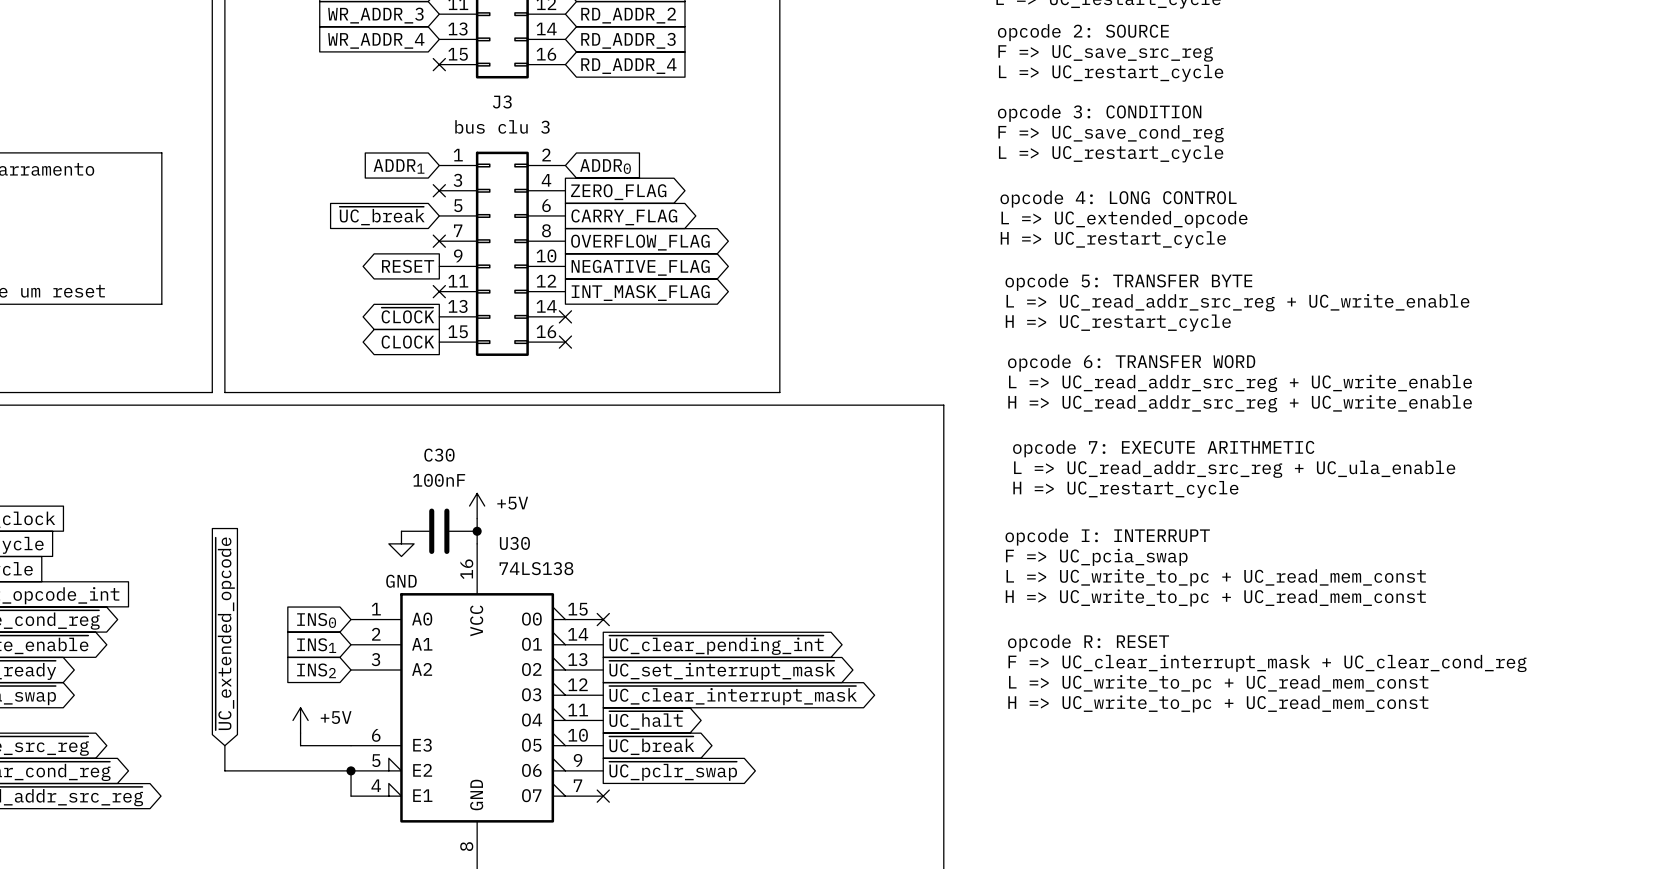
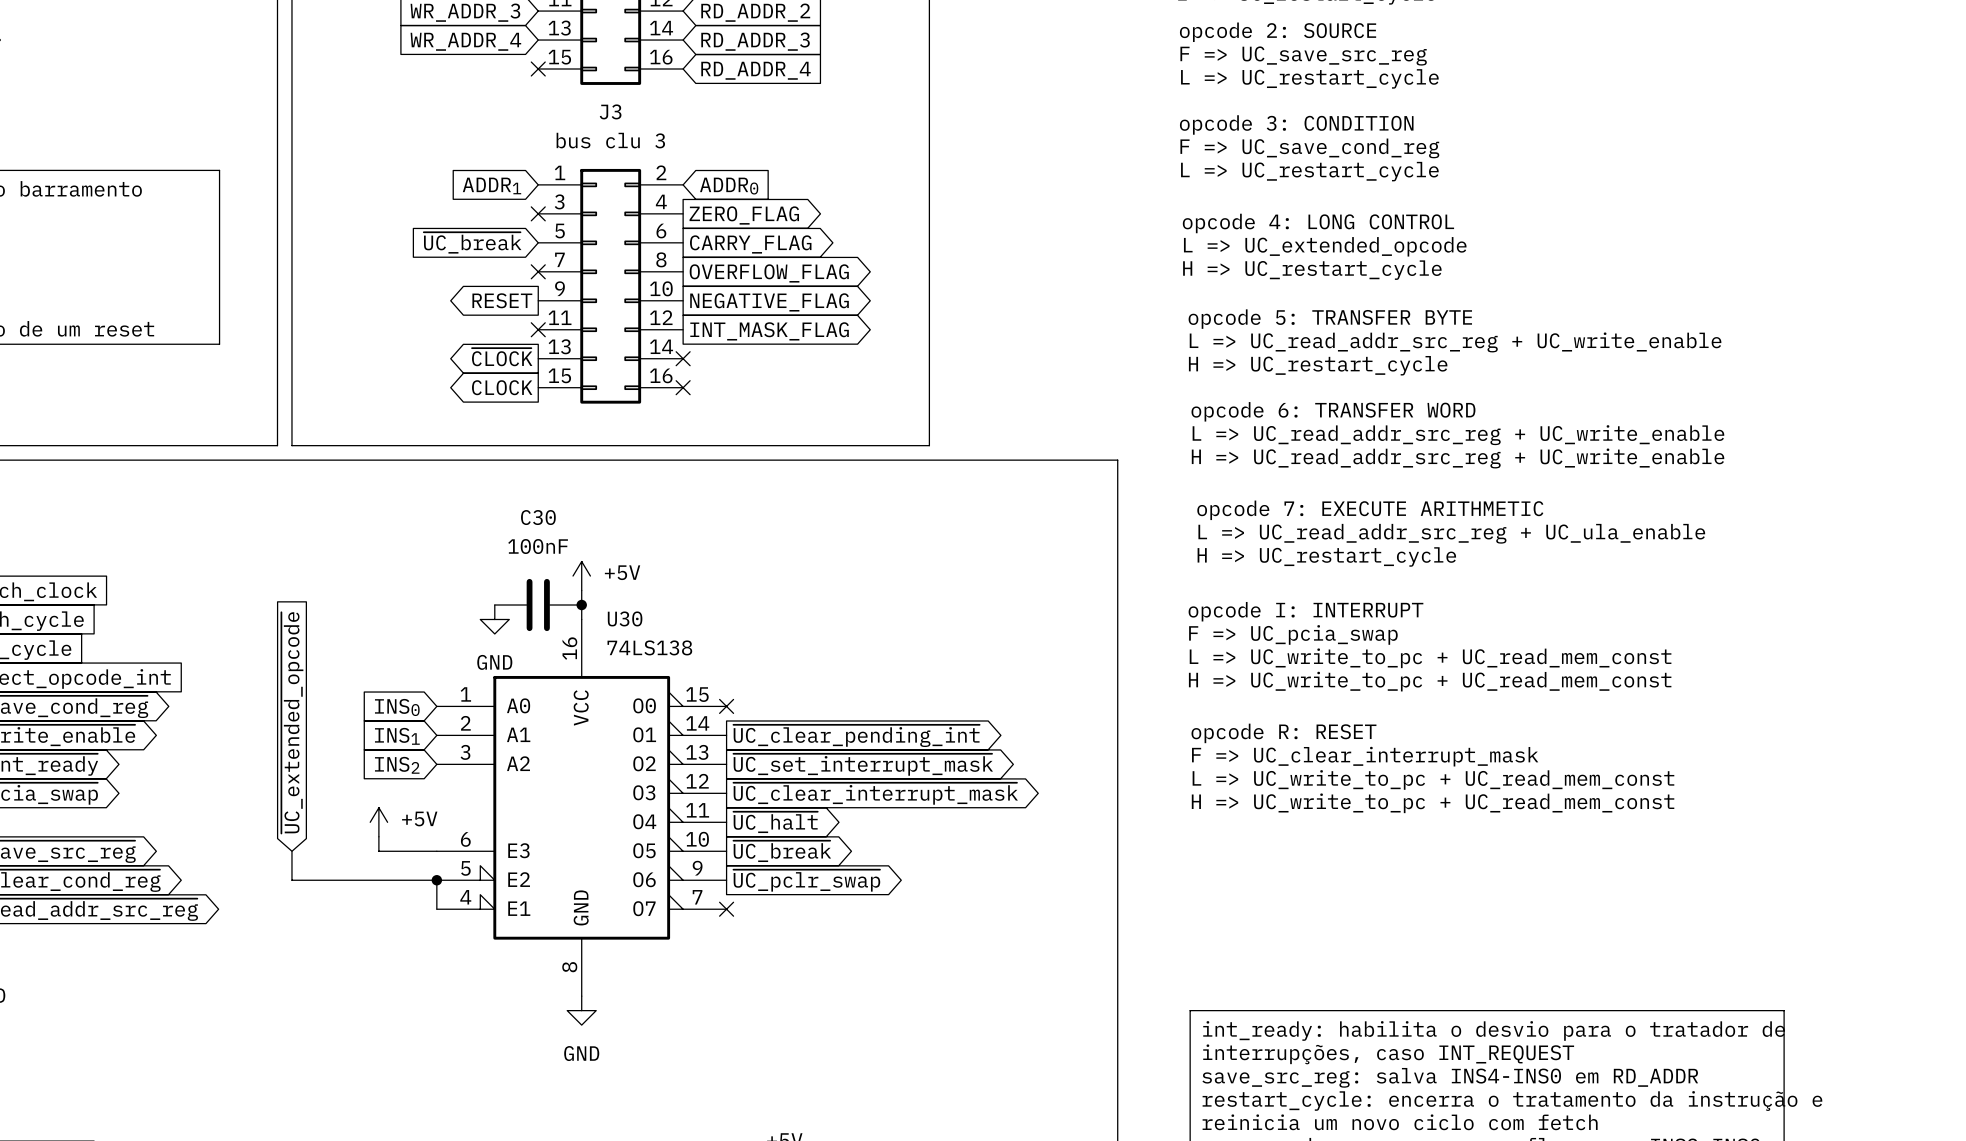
text: F => UC_clear_interrupt_mask + UC_clear_cond_reg (1267, 663) -> F => UC_clear_interrupt_mask (1365, 756)

